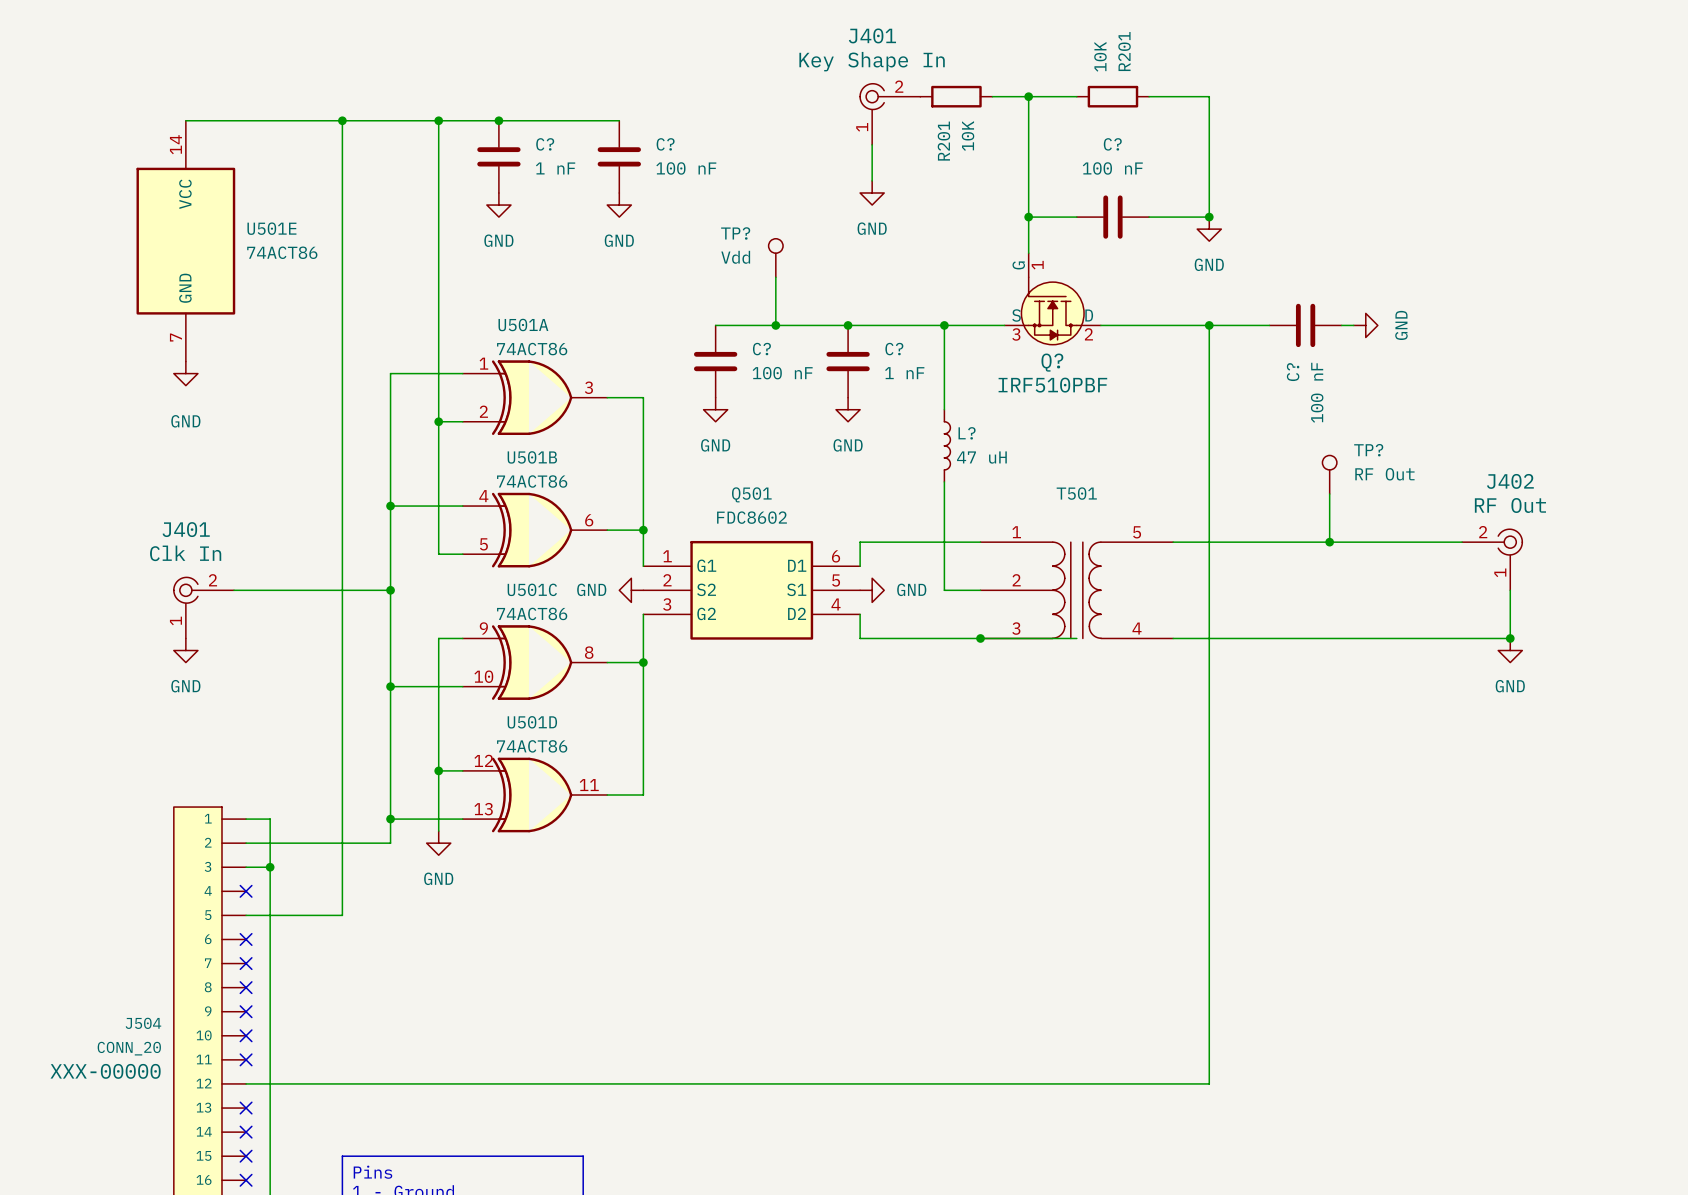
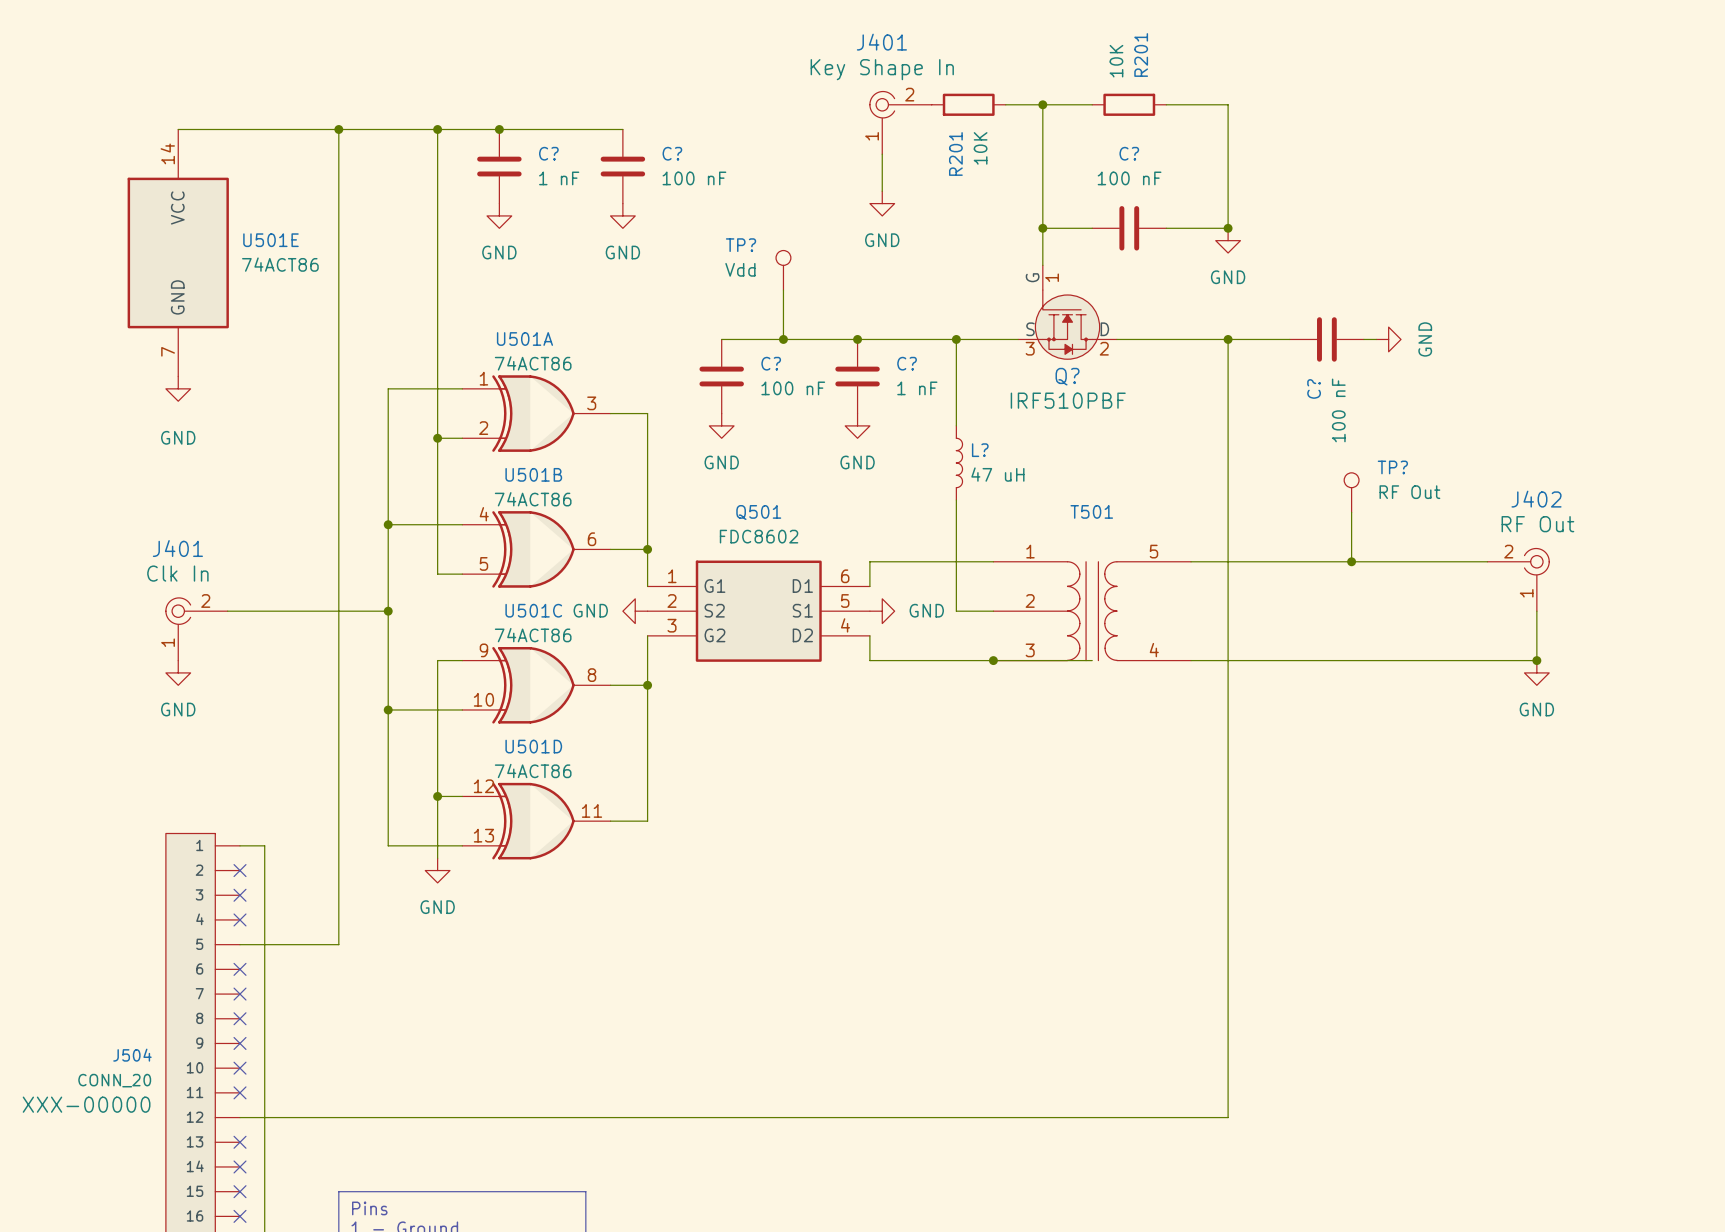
wire: (390, 819) (390, 843) (246, 843) -> none
junction: (390, 819) -> none
no-connect mark: none -> (240, 870)
wire: (246, 867) (270, 867) -> none
no-connect mark: none -> (240, 895)
junction: (270, 867) -> none

